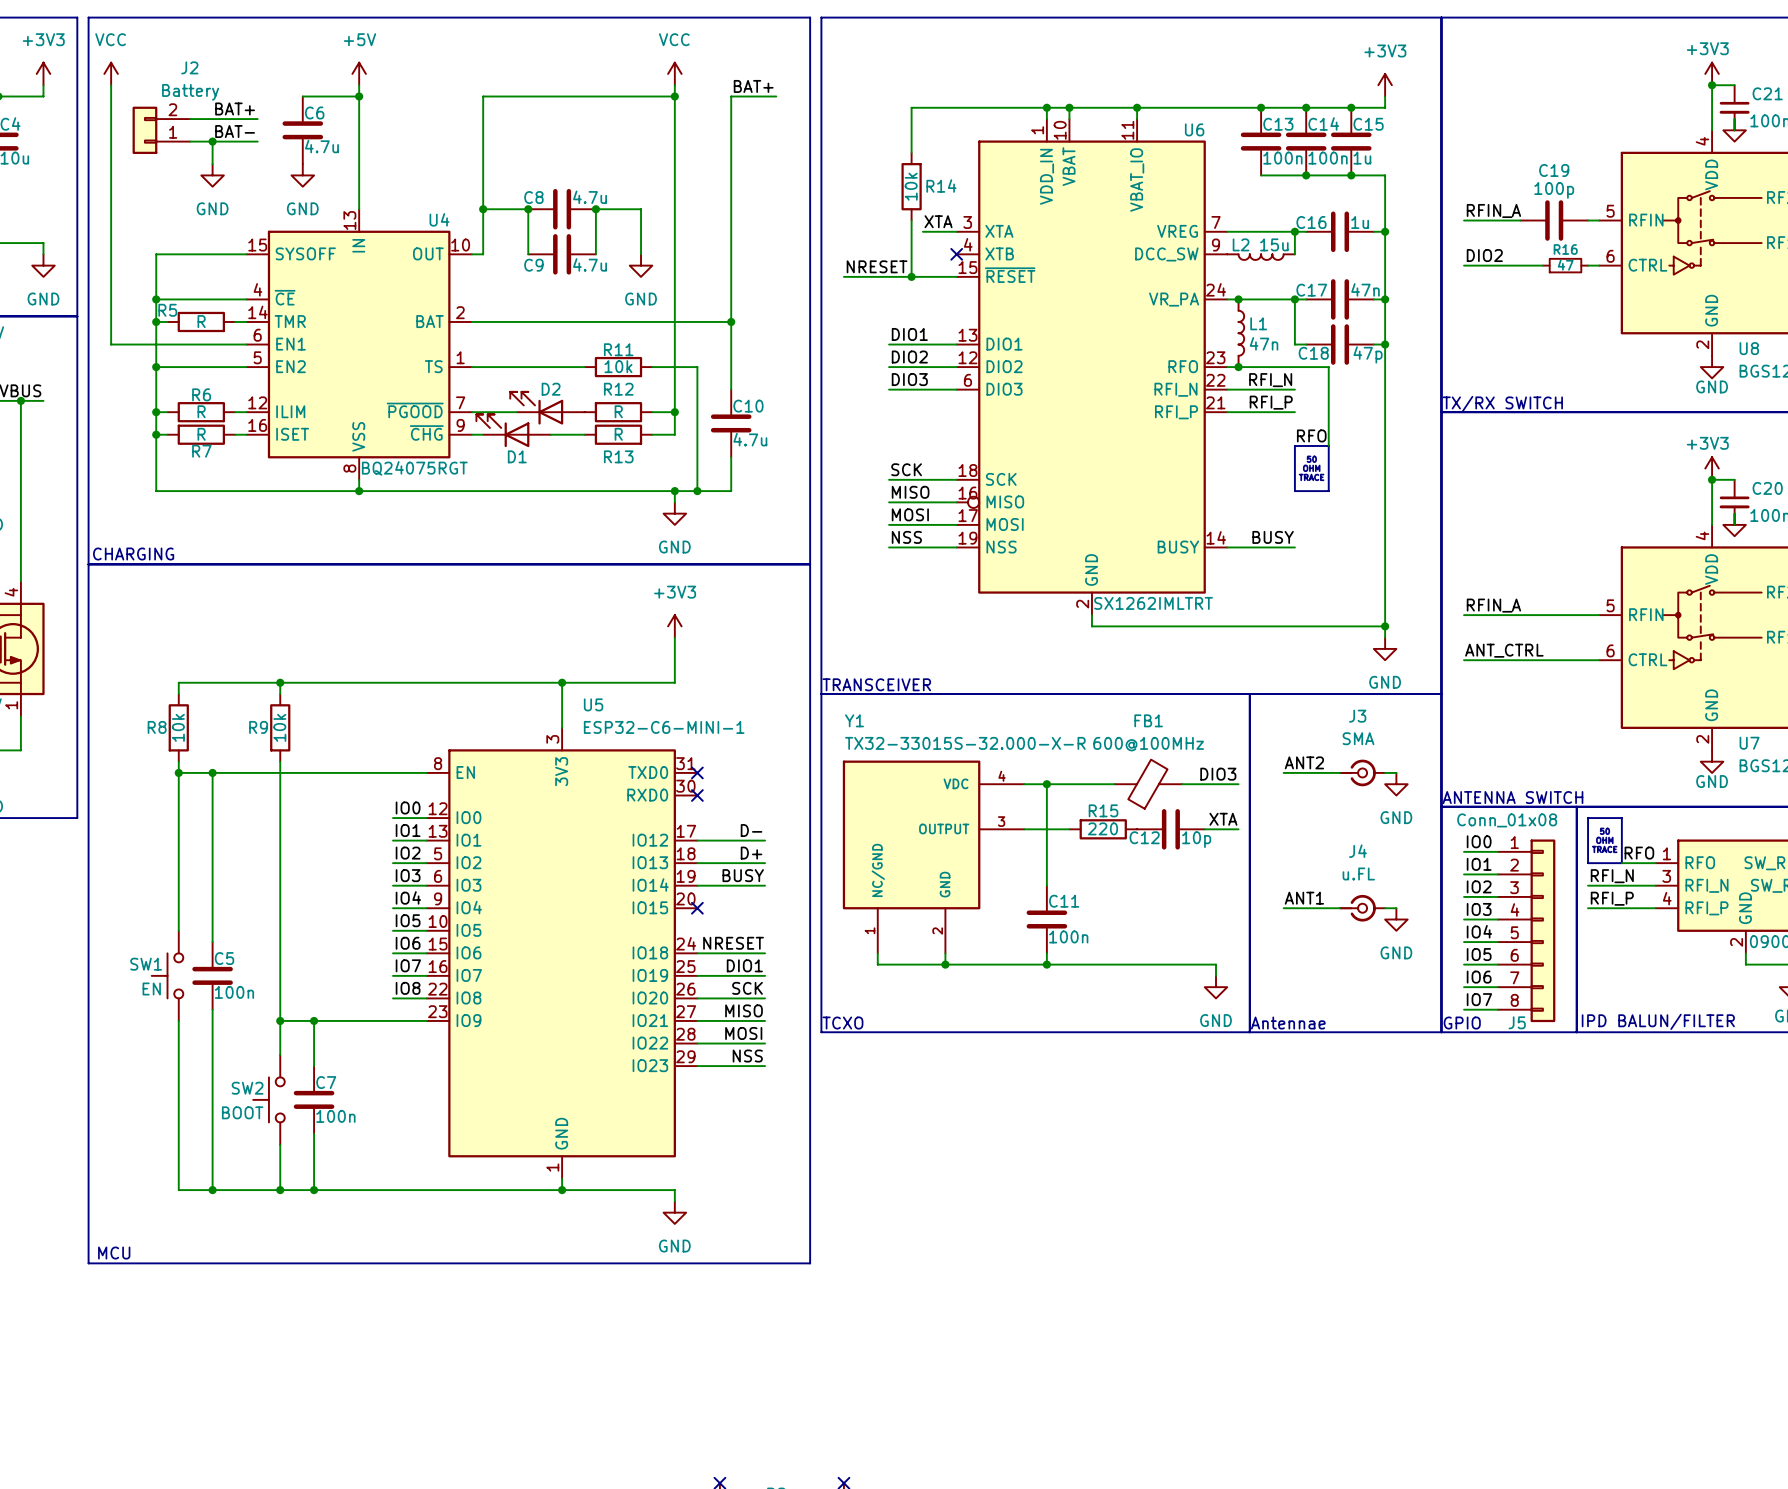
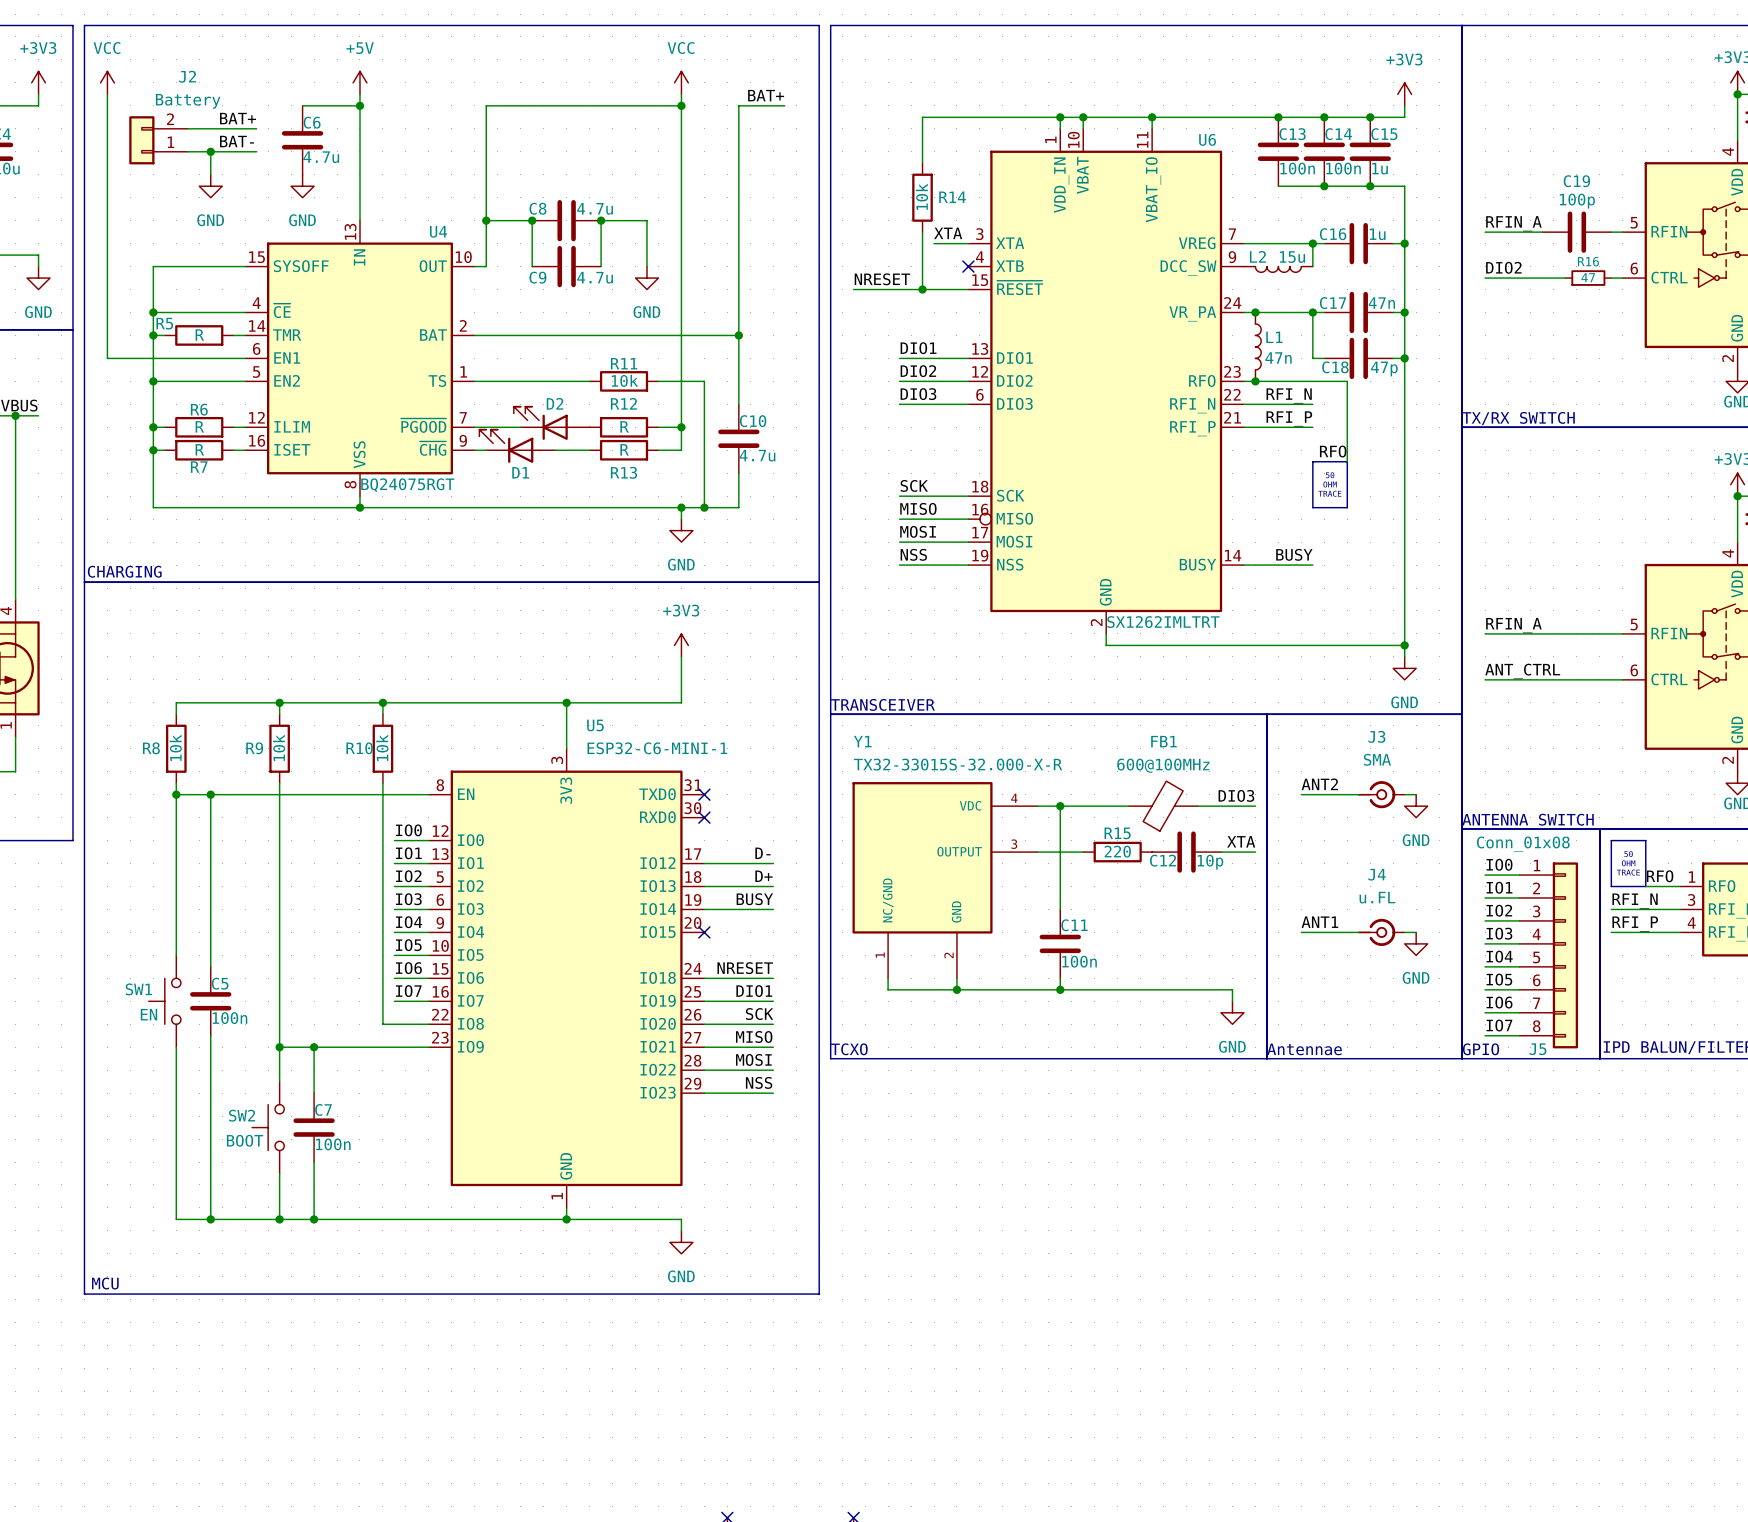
wire: none -> (382, 702) (382, 714)
junction: none -> (382, 702)
R10: none -> 10k (382, 748)
wire: none -> (382, 783) (382, 1024) (394, 1024)
label: IO8 (408, 988) -> none

